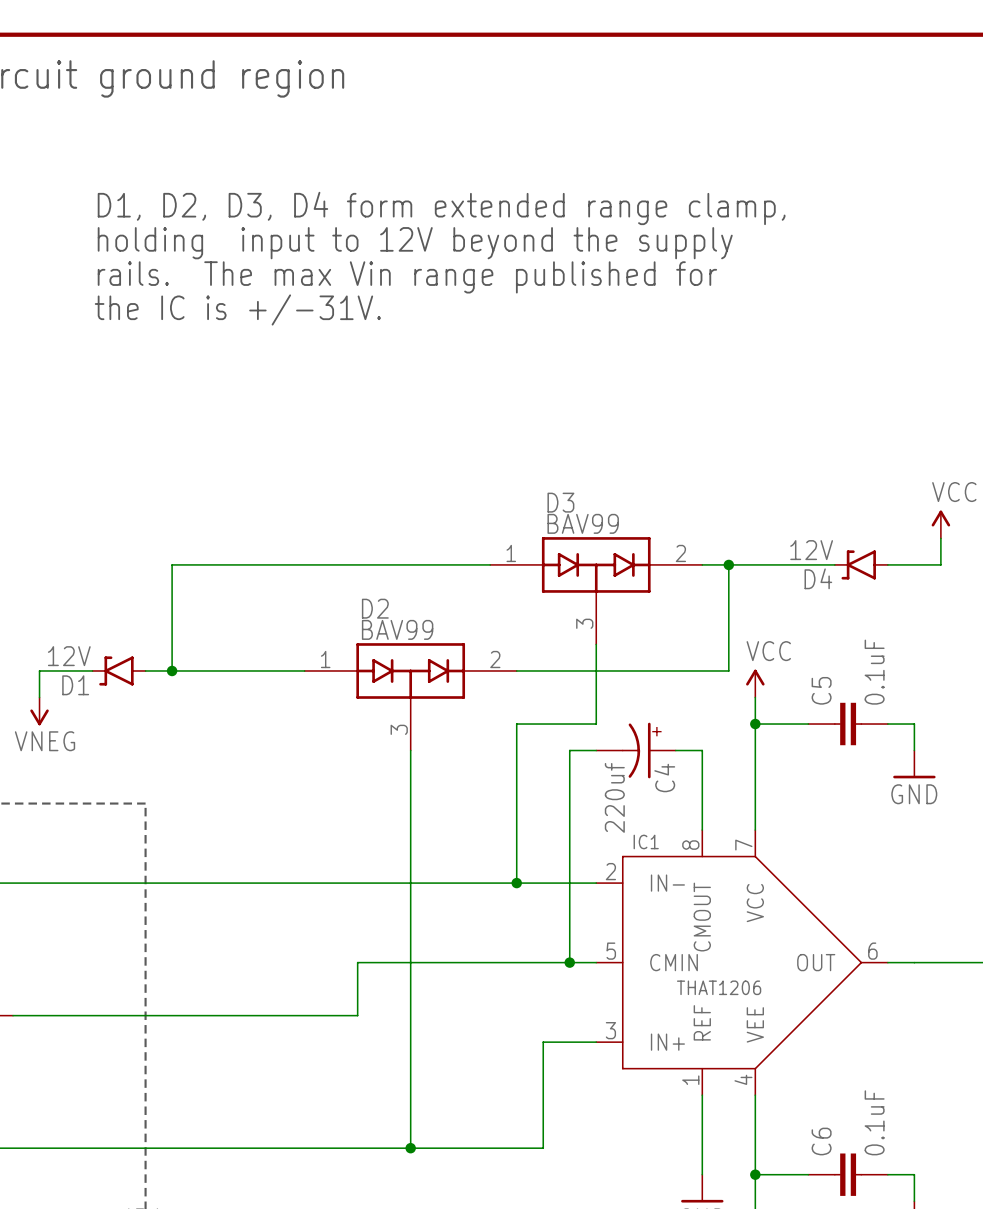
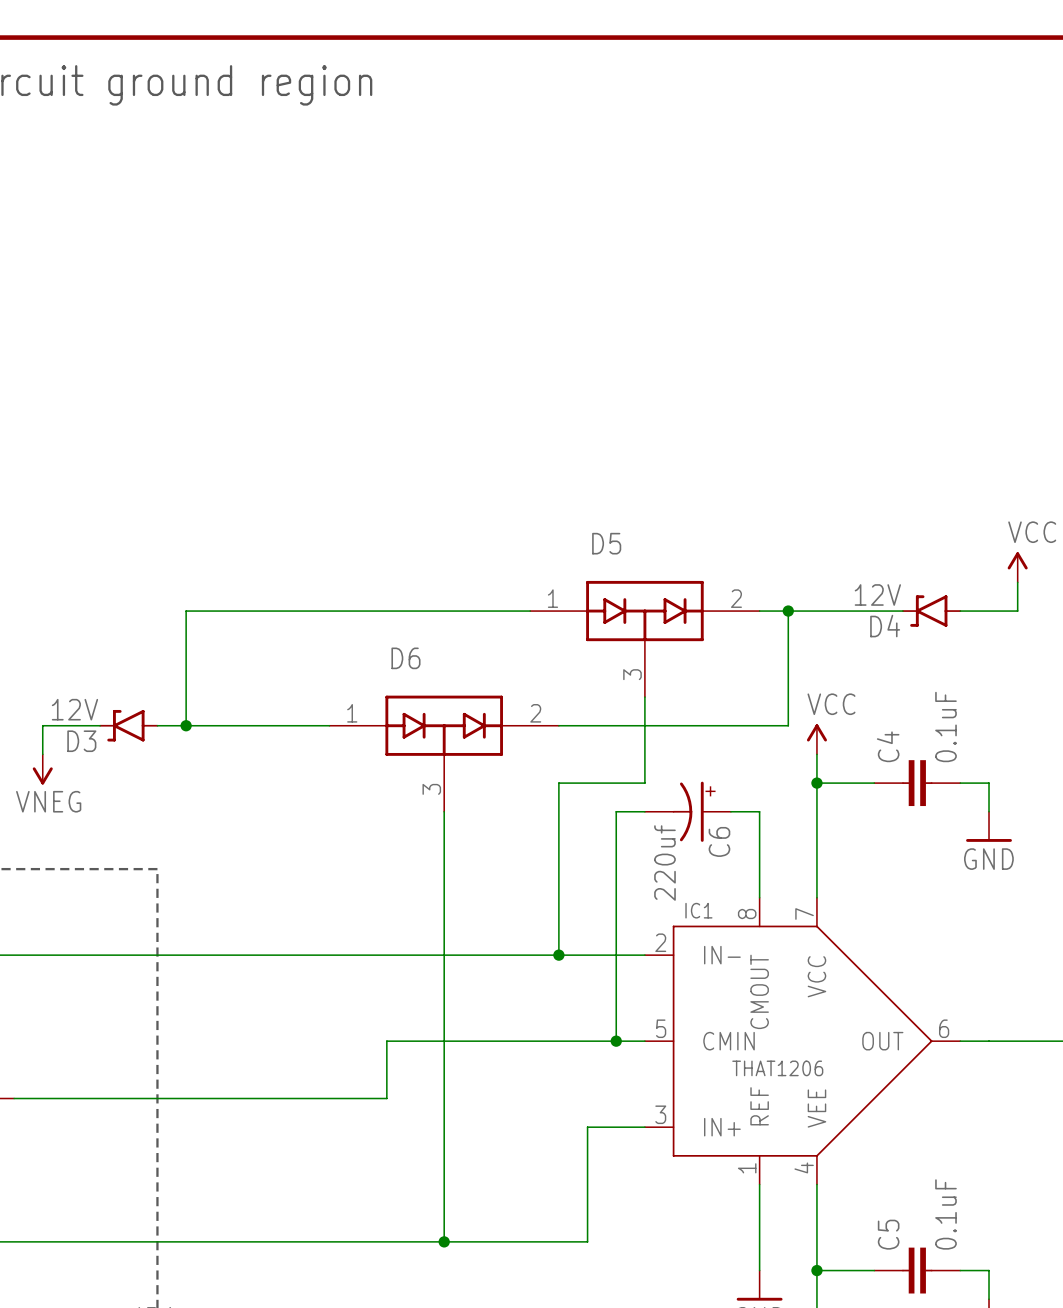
text: D1, D2, D3, D4 form extended range clamp, (441, 208) -> none
text: holding input to 12V beyond the supply (415, 243) -> none
text: rails. The max Vin range published for (407, 277) -> none
text: the IC is +/-31V. (237, 309) -> none
D3 name: D3 (560, 502) -> D5 (606, 543)
D3 value: BAV99 (583, 523) -> none
D2 name: D2 (375, 608) -> D6 (405, 658)
D2 value: BAV99 (397, 629) -> none
D1 name: D1 (75, 685) -> D3 (81, 741)
C5 name: C5 (821, 690) -> C4 (888, 746)
C4 name: C4 (664, 778) -> C6 (719, 841)
C6 name: C6 (821, 1141) -> C5 (888, 1234)

